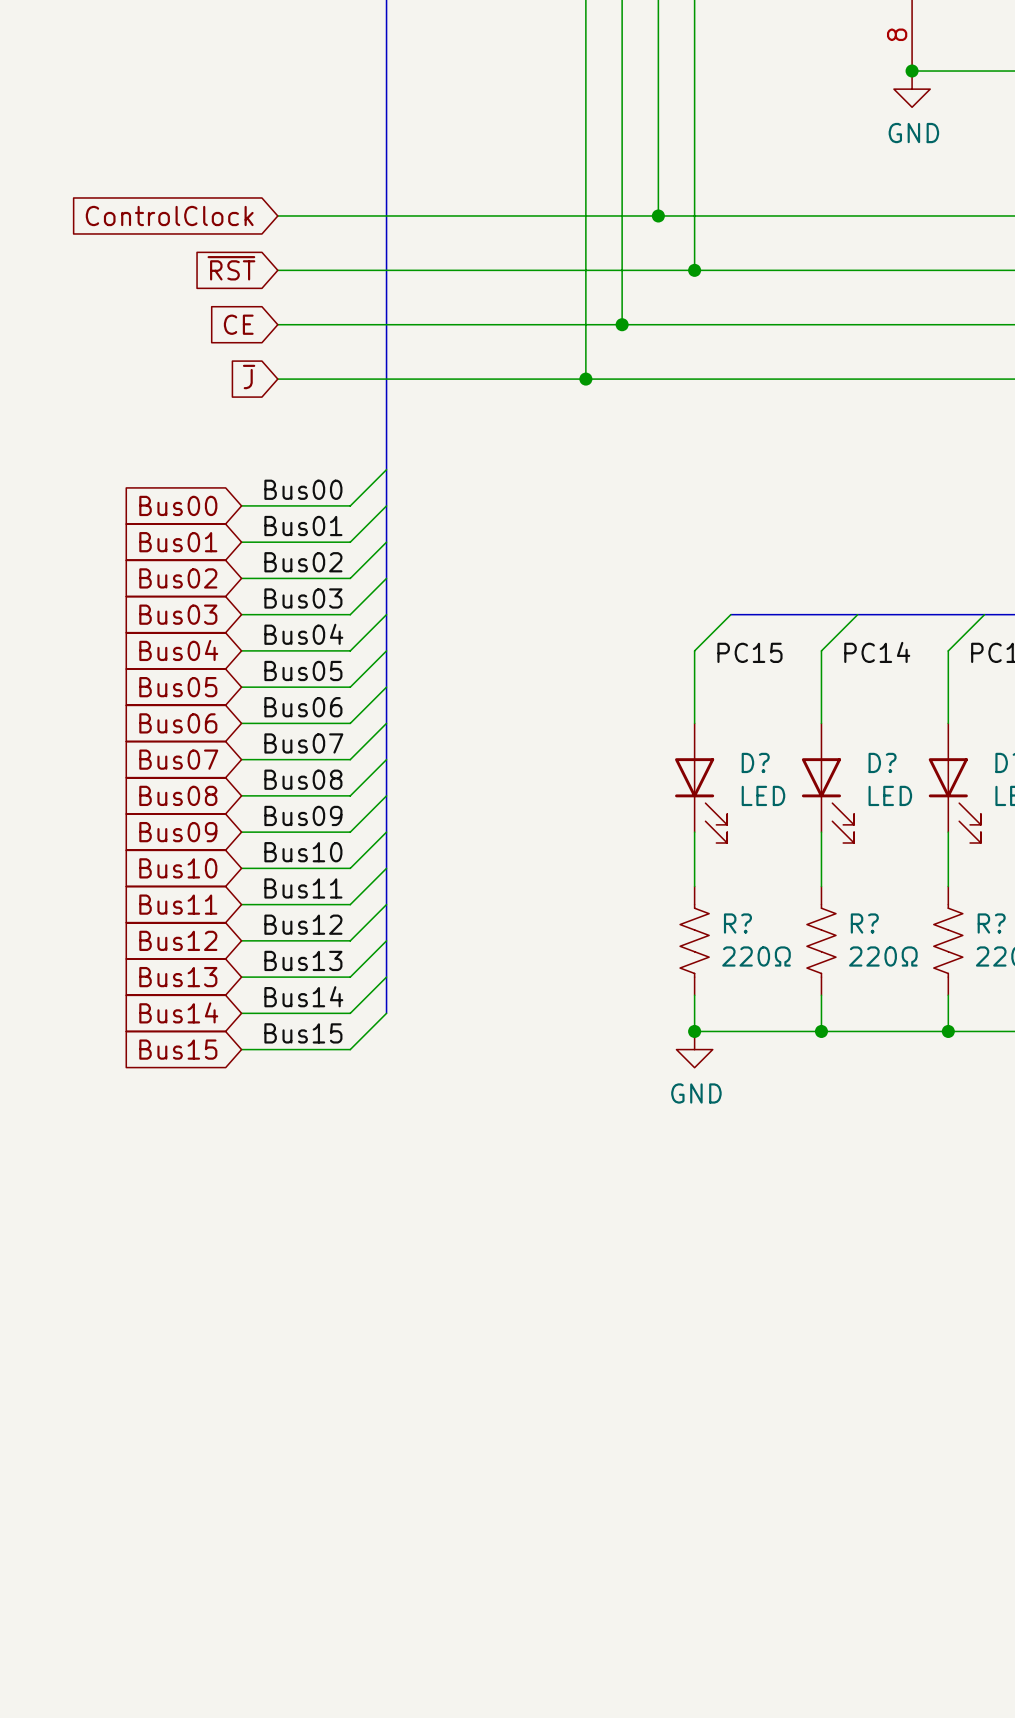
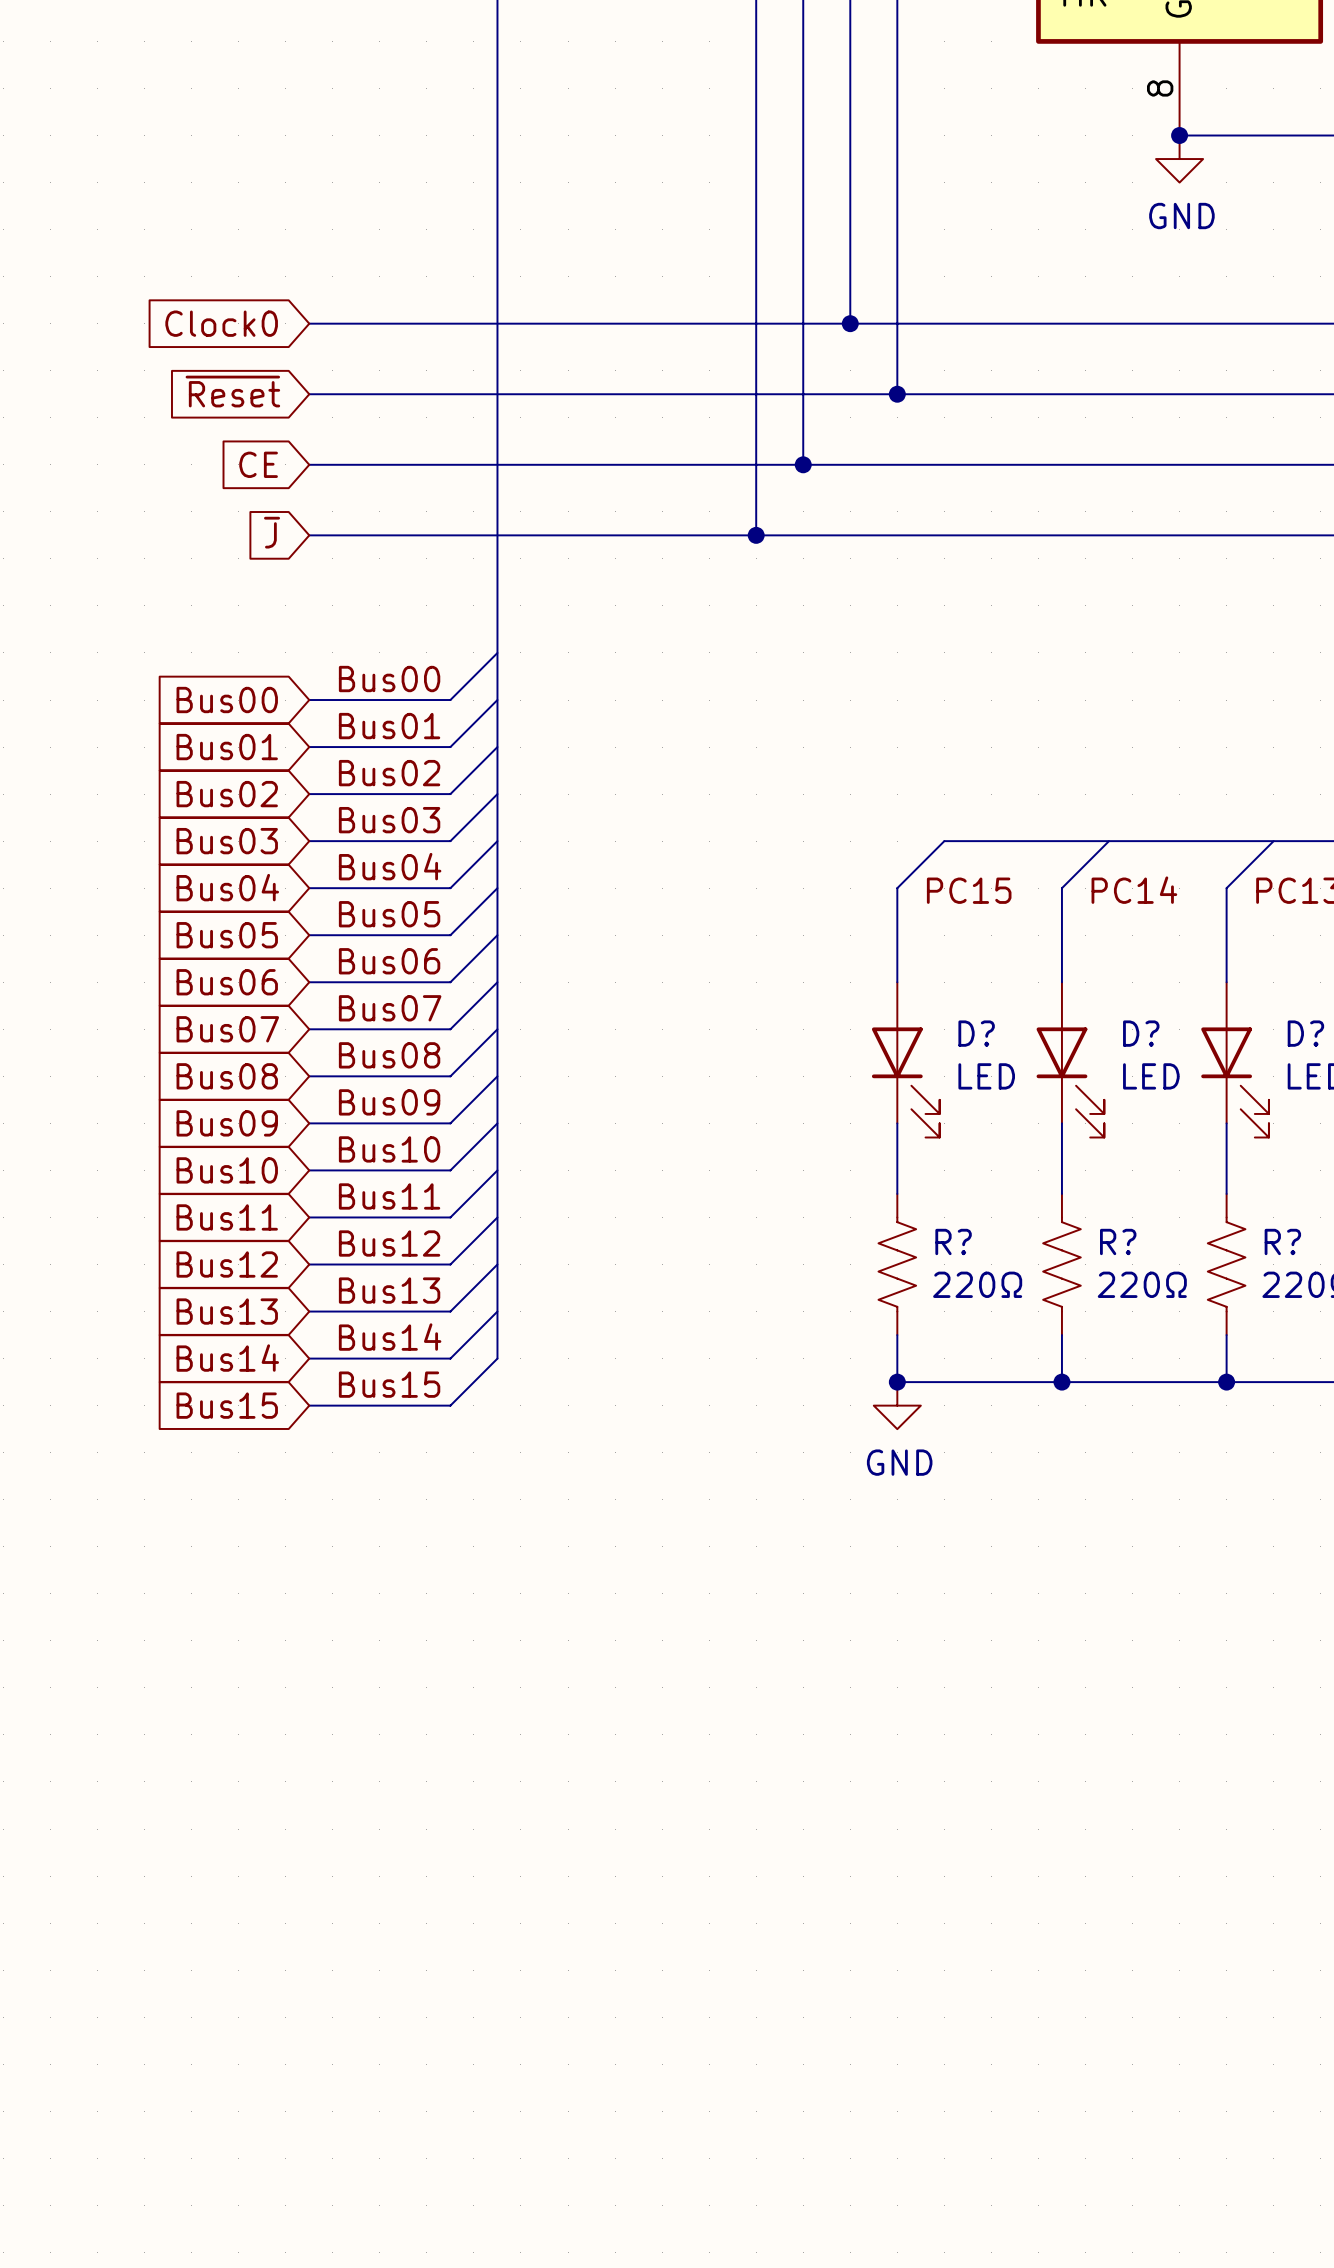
global label: ControlClock (169, 215) -> none
global label: none -> Clock0 (221, 323)
wire: none -> (309, 323) (356, 323)
global label: none -> ~{Reset} (232, 391)
global label: ~{RST} (231, 268) -> none
wire: none -> (309, 394) (356, 394)
global label position: CE (238, 324) -> CE (258, 464)
wire: none -> (309, 464) (356, 464)
global label position: ~{J} (249, 377) -> ~{J} (272, 532)
wire: none -> (309, 535) (356, 535)

